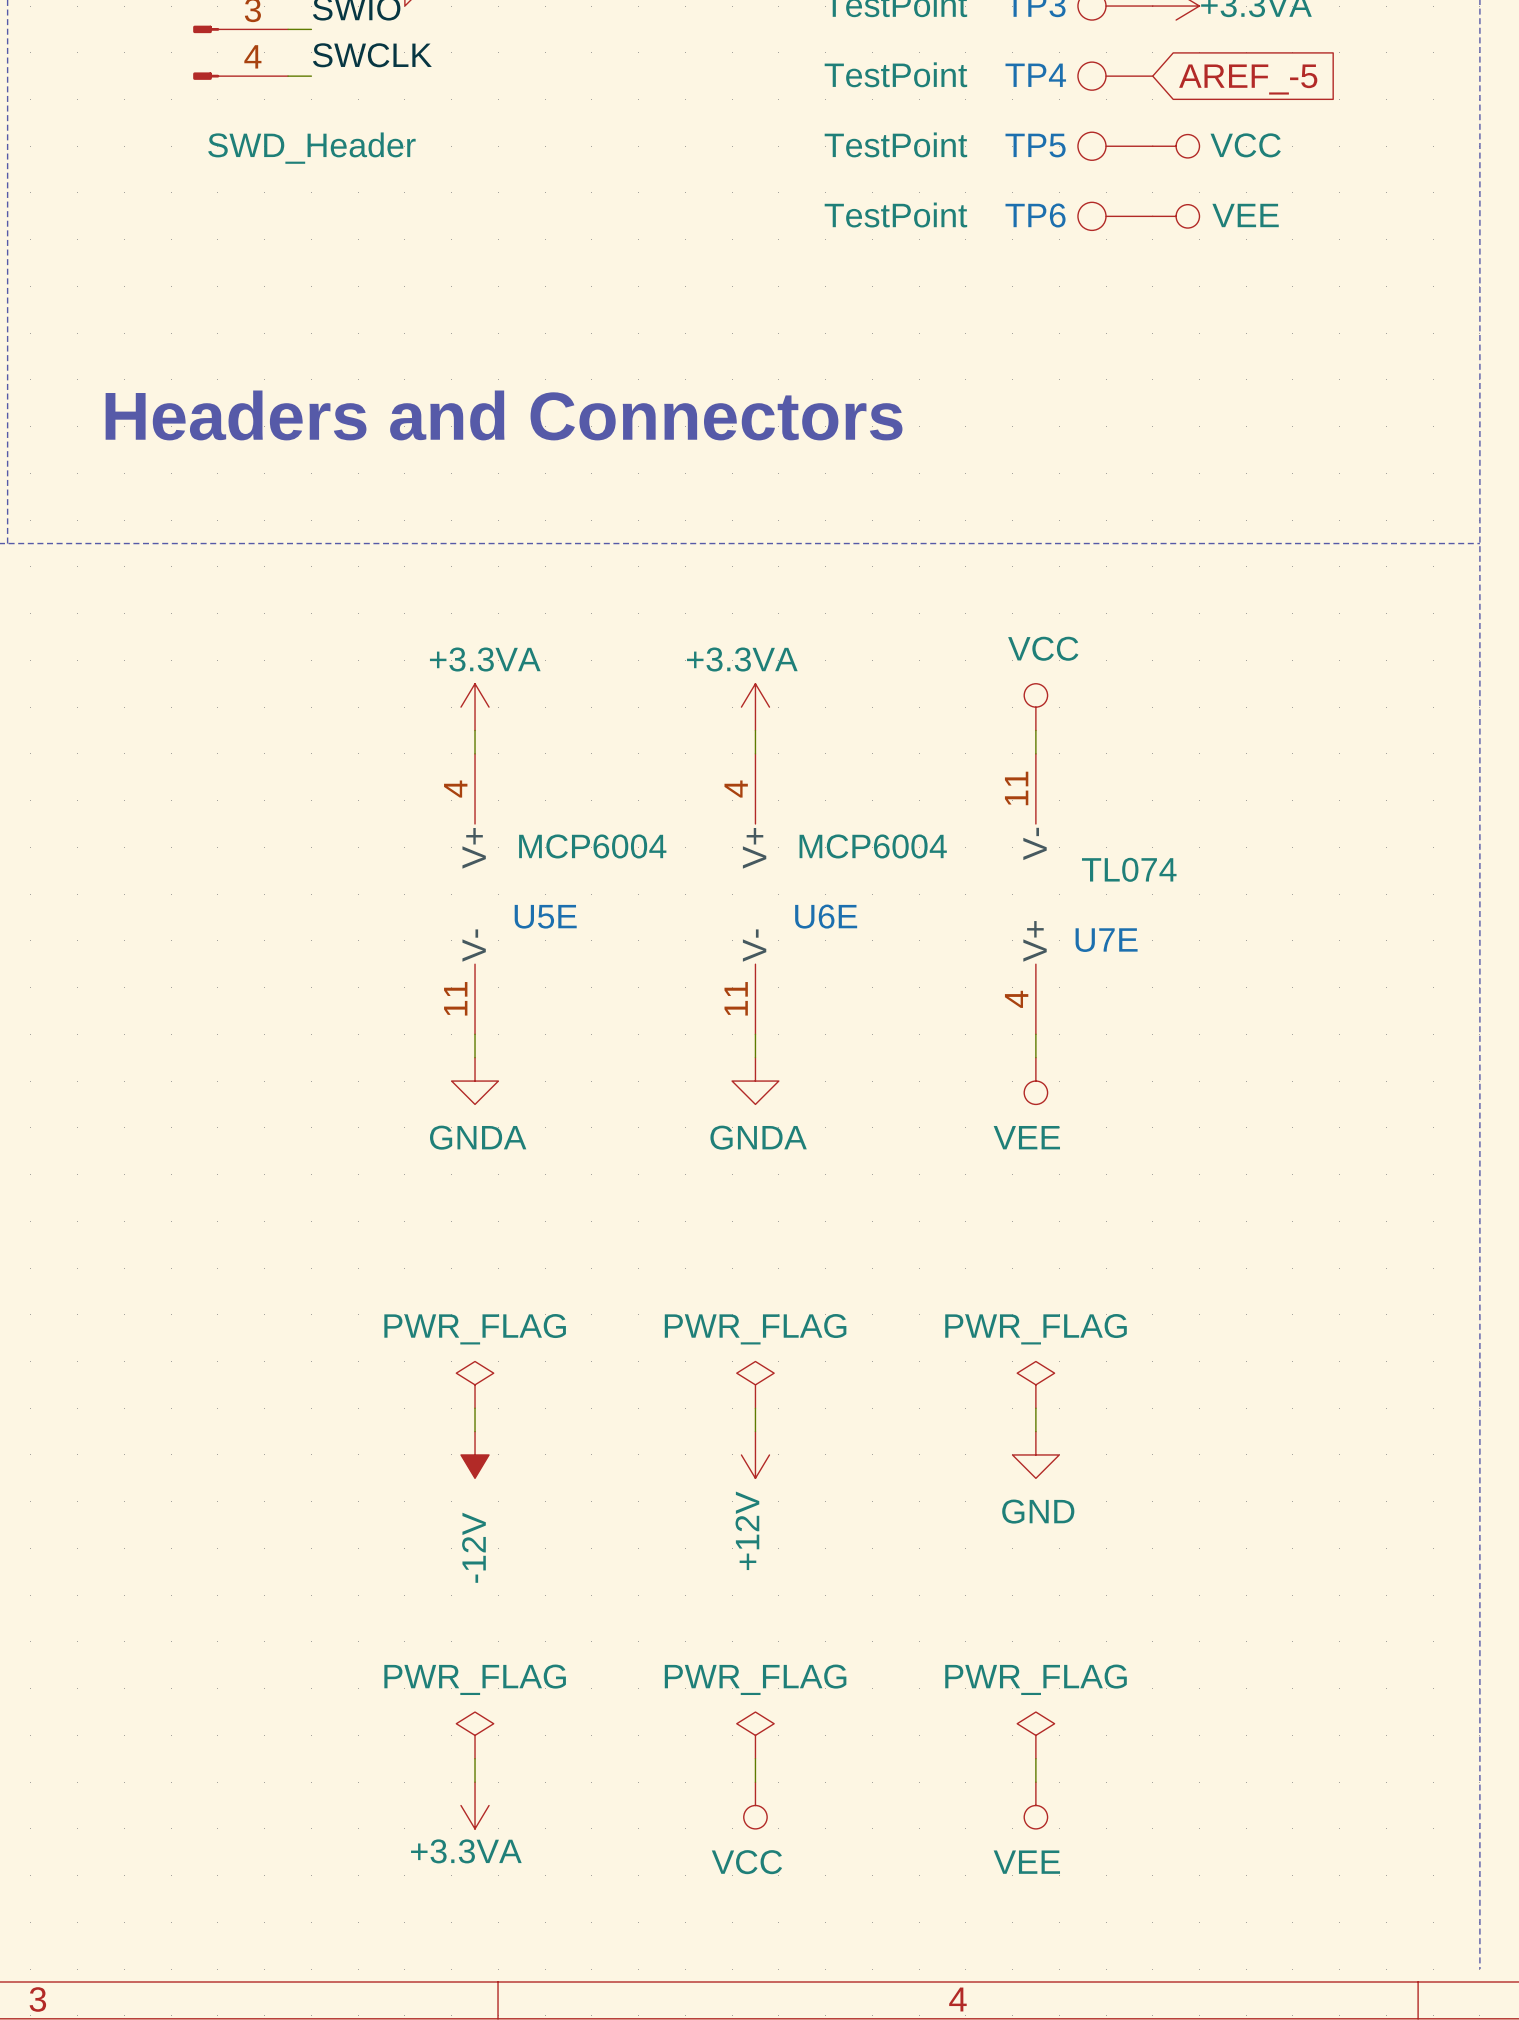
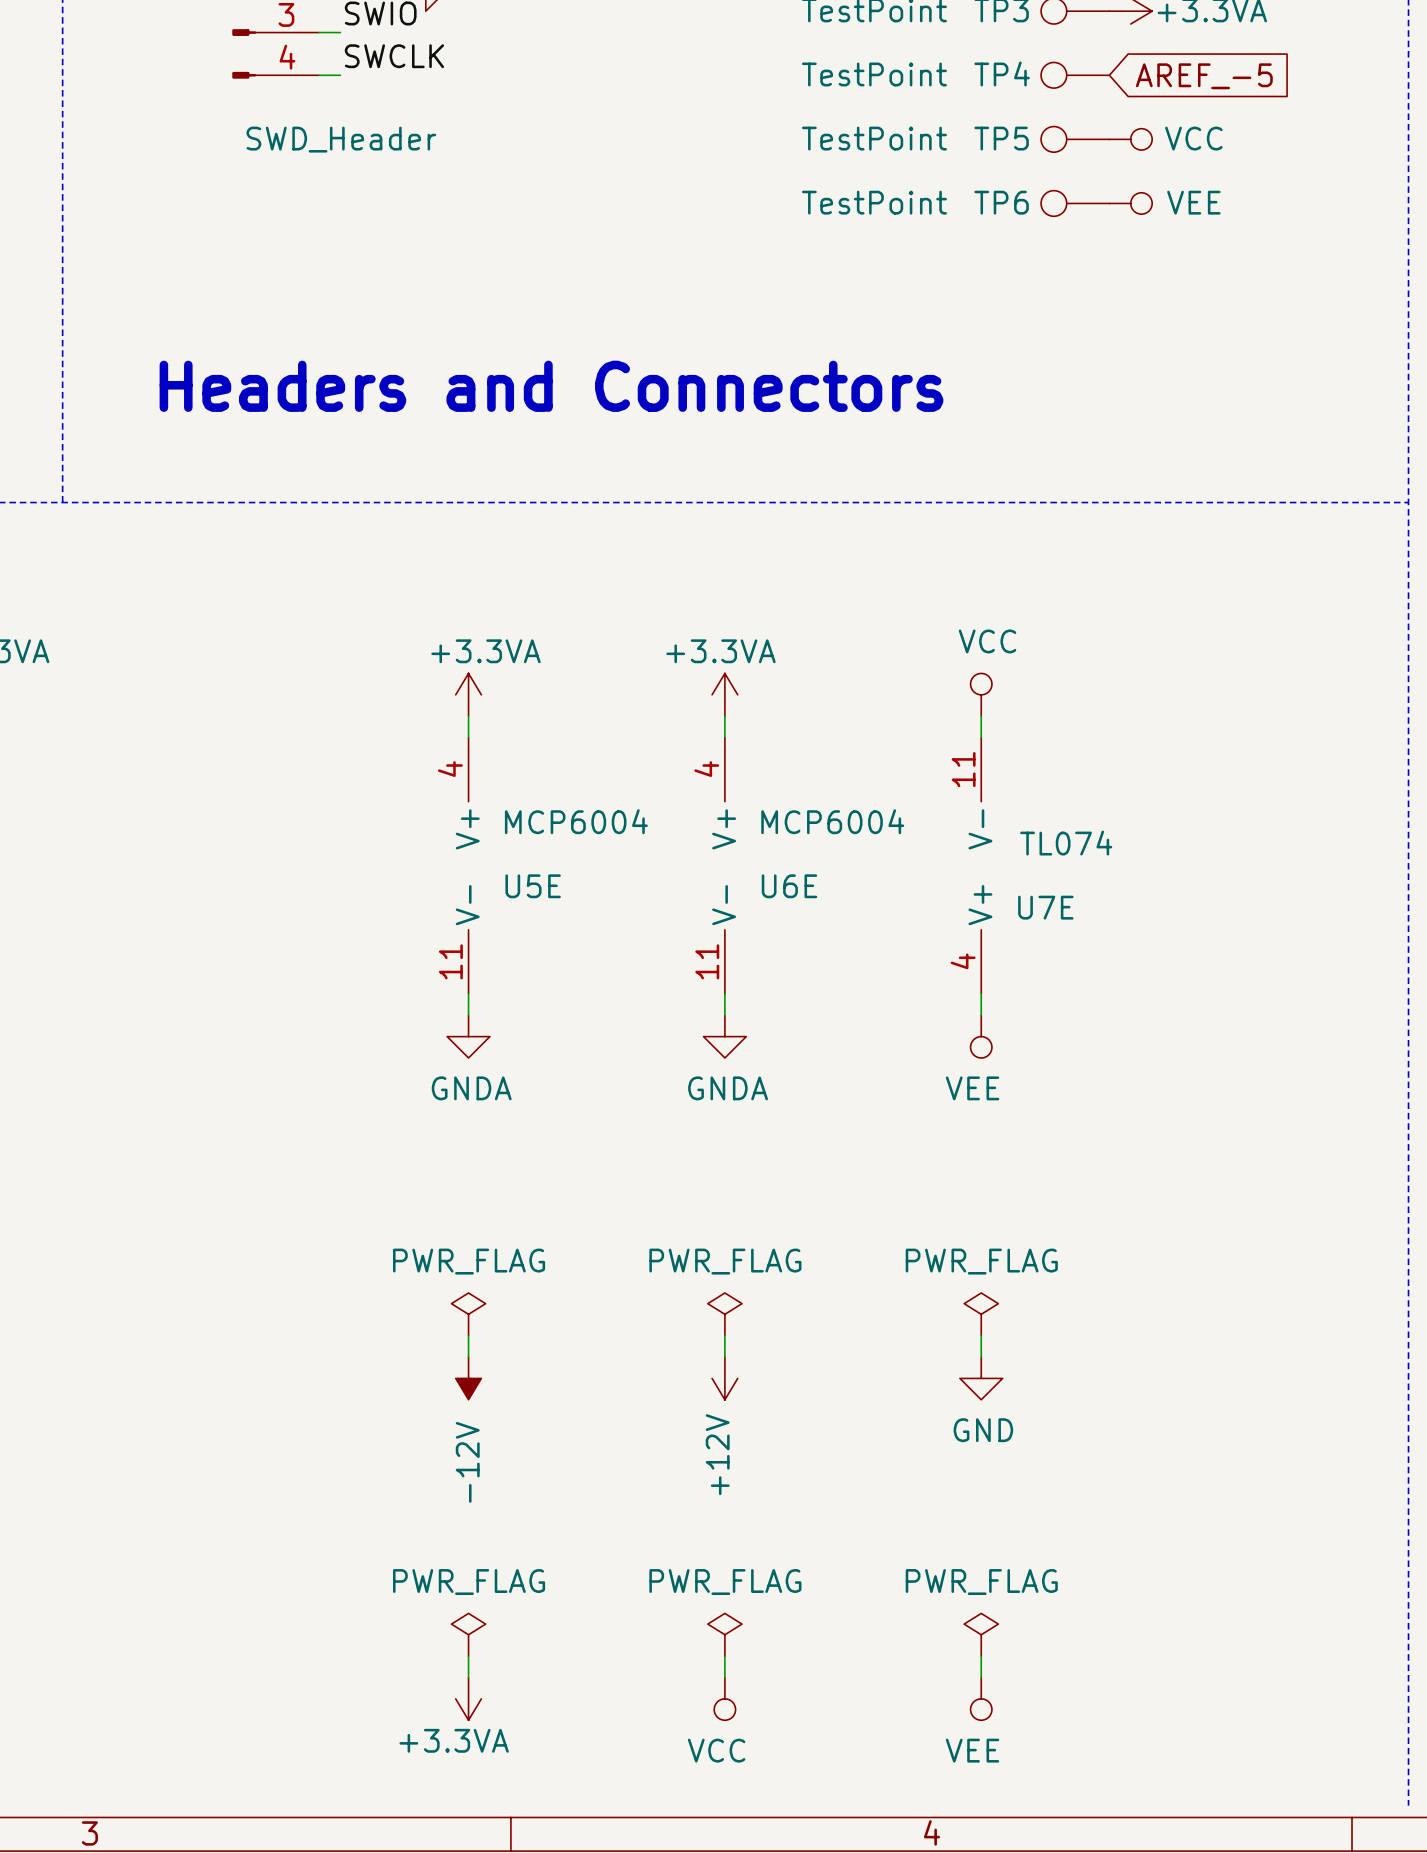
power symbol position: +3.3VA (475, 707) -> +3.3VA (468, 694)
power symbol position: +3.3VA (755, 707) -> +3.3VA (724, 694)
power symbol position: VCC (1035, 707) -> VCC (981, 694)
wire: (475, 730) (475, 753) -> (468, 716) (468, 737)
wire: (755, 730) (755, 753) -> (724, 716) (724, 737)
wire: (1035, 730) (1035, 753) -> (981, 716) (981, 737)
U5E position: (475, 894) -> (468, 865)
U6E position: (755, 894) -> (724, 865)
U7E position: (1035, 894) -> (981, 865)
wire: (475, 1034) (475, 1057) -> (468, 993) (468, 1015)
wire: (755, 1034) (755, 1057) -> (724, 993) (724, 1015)
wire: (1035, 1034) (1035, 1057) -> (981, 993) (981, 1015)
power symbol position: GNDA (475, 1081) -> GNDA (468, 1036)
power symbol position: GNDA (755, 1081) -> GNDA (724, 1036)
power symbol position: VEE (1035, 1081) -> VEE (981, 1036)
power symbol position: PWR_FLAG (475, 1384) -> PWR_FLAG (468, 1314)
power symbol position: PWR_FLAG (755, 1384) -> PWR_FLAG (724, 1314)
power symbol position: PWR_FLAG (1035, 1384) -> PWR_FLAG (981, 1314)
wire: (475, 1408) (475, 1431) -> (468, 1335) (468, 1357)
wire: (755, 1408) (755, 1431) -> (724, 1335) (724, 1357)
wire: (1035, 1408) (1035, 1431) -> (981, 1335) (981, 1357)
power symbol position: -12V (475, 1454) -> -12V (468, 1378)
power symbol position: +12V (755, 1454) -> +12V (724, 1378)
power symbol position: GND (1035, 1454) -> GND (981, 1378)
power symbol position: PWR_FLAG (475, 1735) -> PWR_FLAG (468, 1634)
power symbol position: PWR_FLAG (755, 1735) -> PWR_FLAG (724, 1634)
power symbol position: PWR_FLAG (1035, 1735) -> PWR_FLAG (981, 1634)
wire: (475, 1758) (475, 1782) -> (468, 1656) (468, 1677)
wire: (755, 1758) (755, 1782) -> (724, 1656) (724, 1677)
wire: (1035, 1758) (1035, 1782) -> (981, 1656) (981, 1677)
power symbol position: +3.3VA (475, 1805) -> +3.3VA (468, 1698)
power symbol position: VCC (755, 1805) -> VCC (724, 1698)
power symbol position: VEE (1035, 1805) -> VEE (981, 1698)

